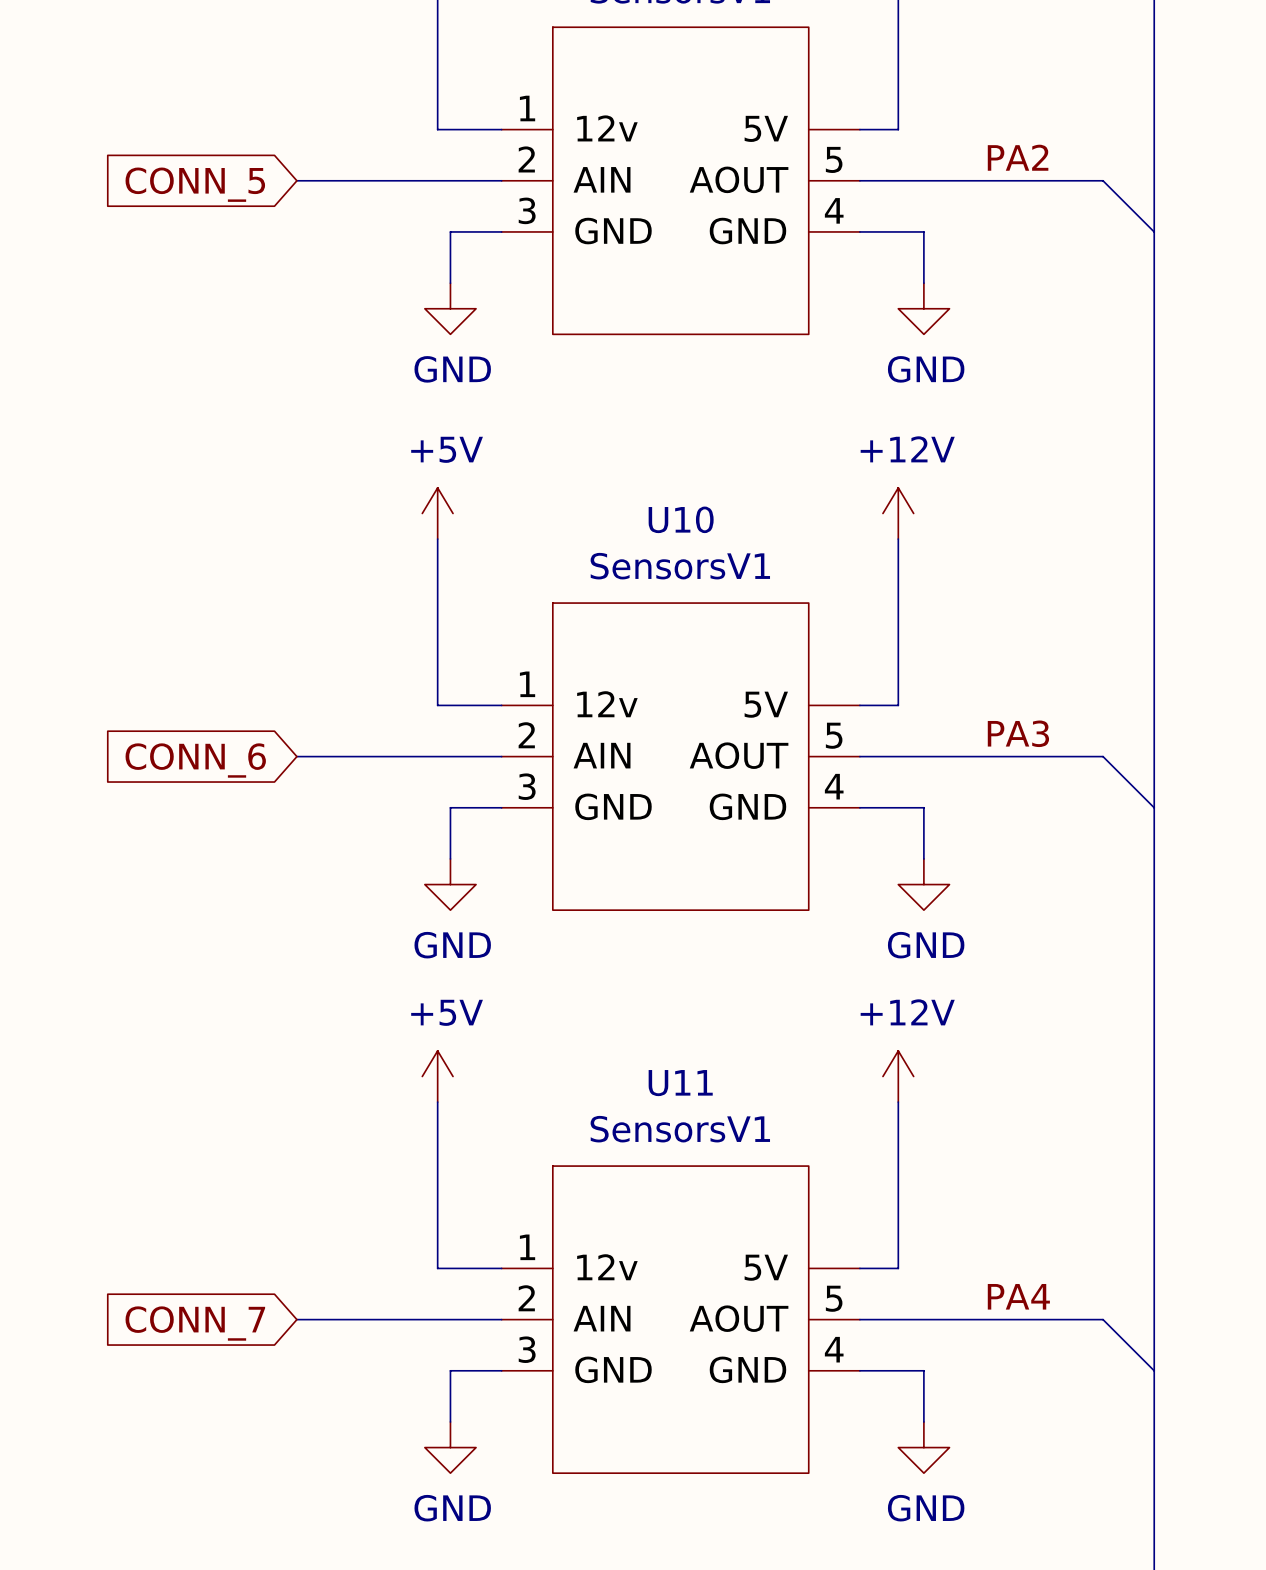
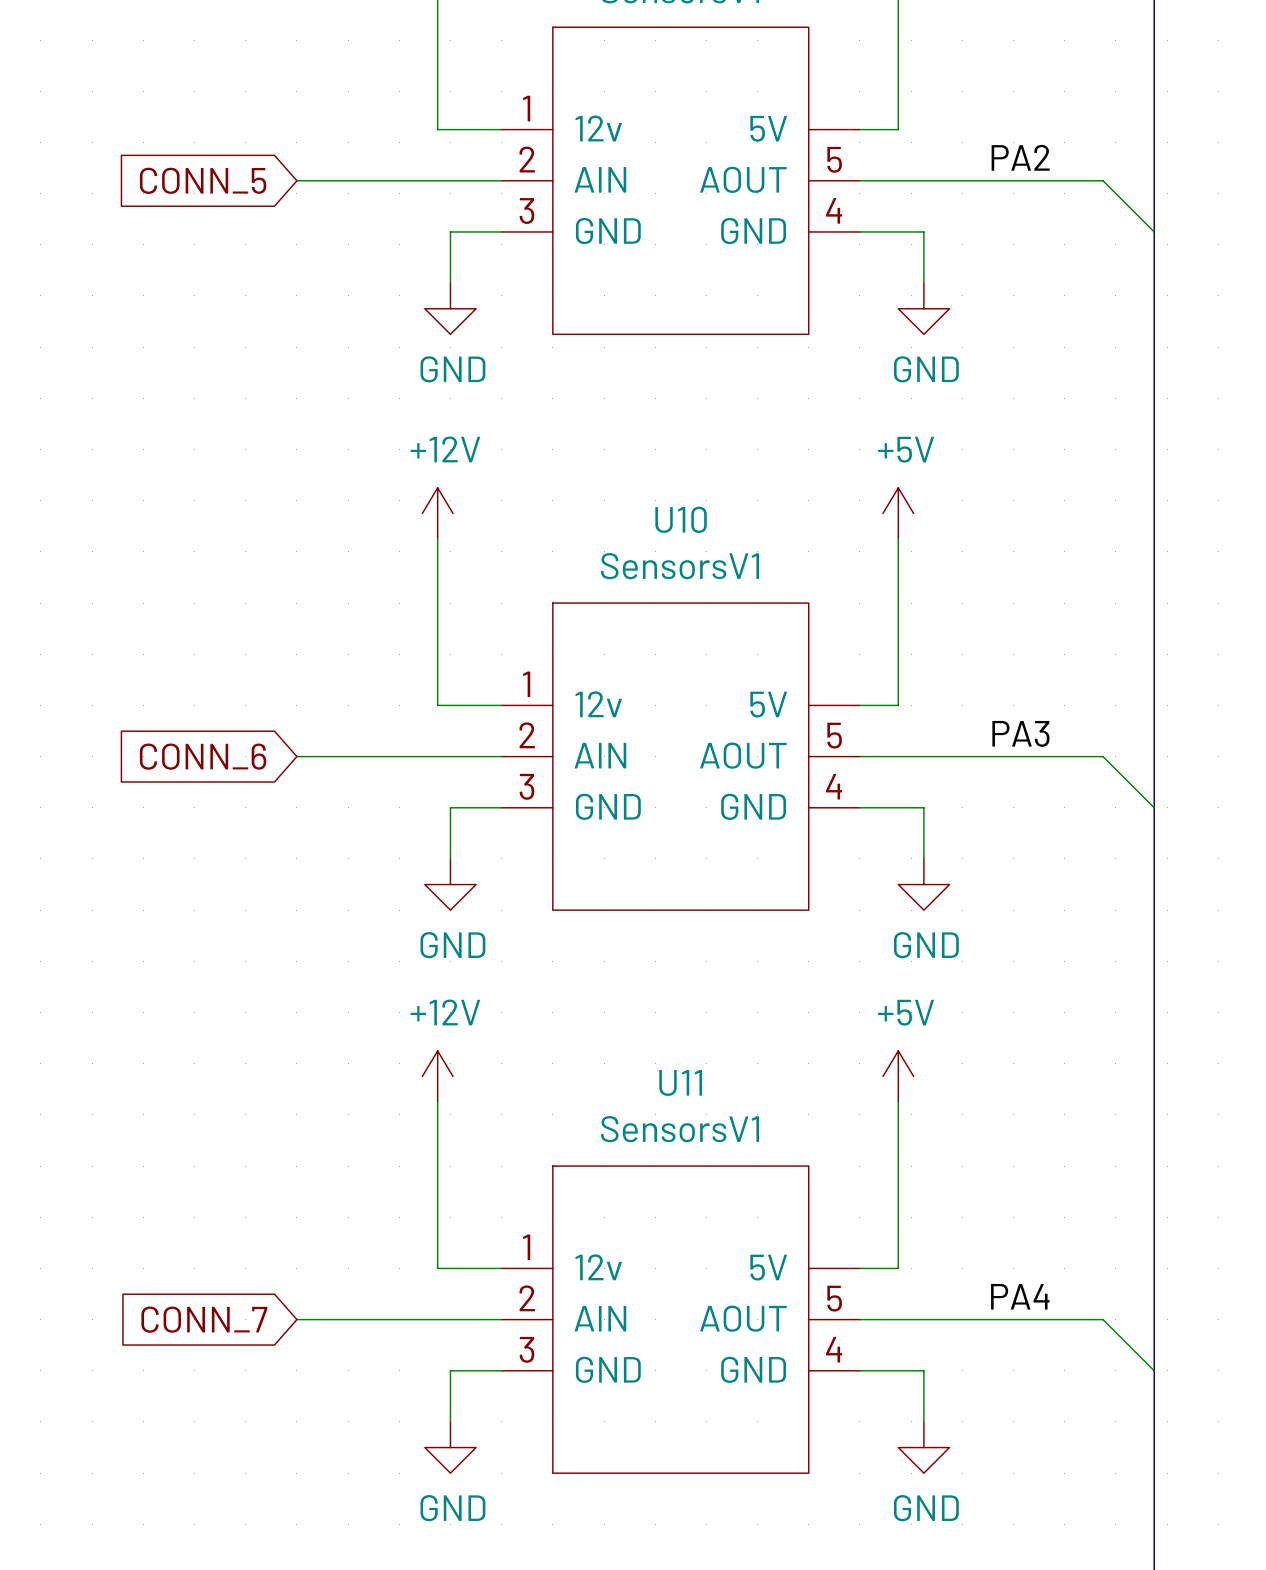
power symbol: +5V (437, 513) -> +12V (437, 513)
power symbol: +12V (898, 513) -> +5V (898, 513)
power symbol: +5V (437, 1076) -> +12V (437, 1076)
power symbol: +12V (898, 1076) -> +5V (898, 1076)

